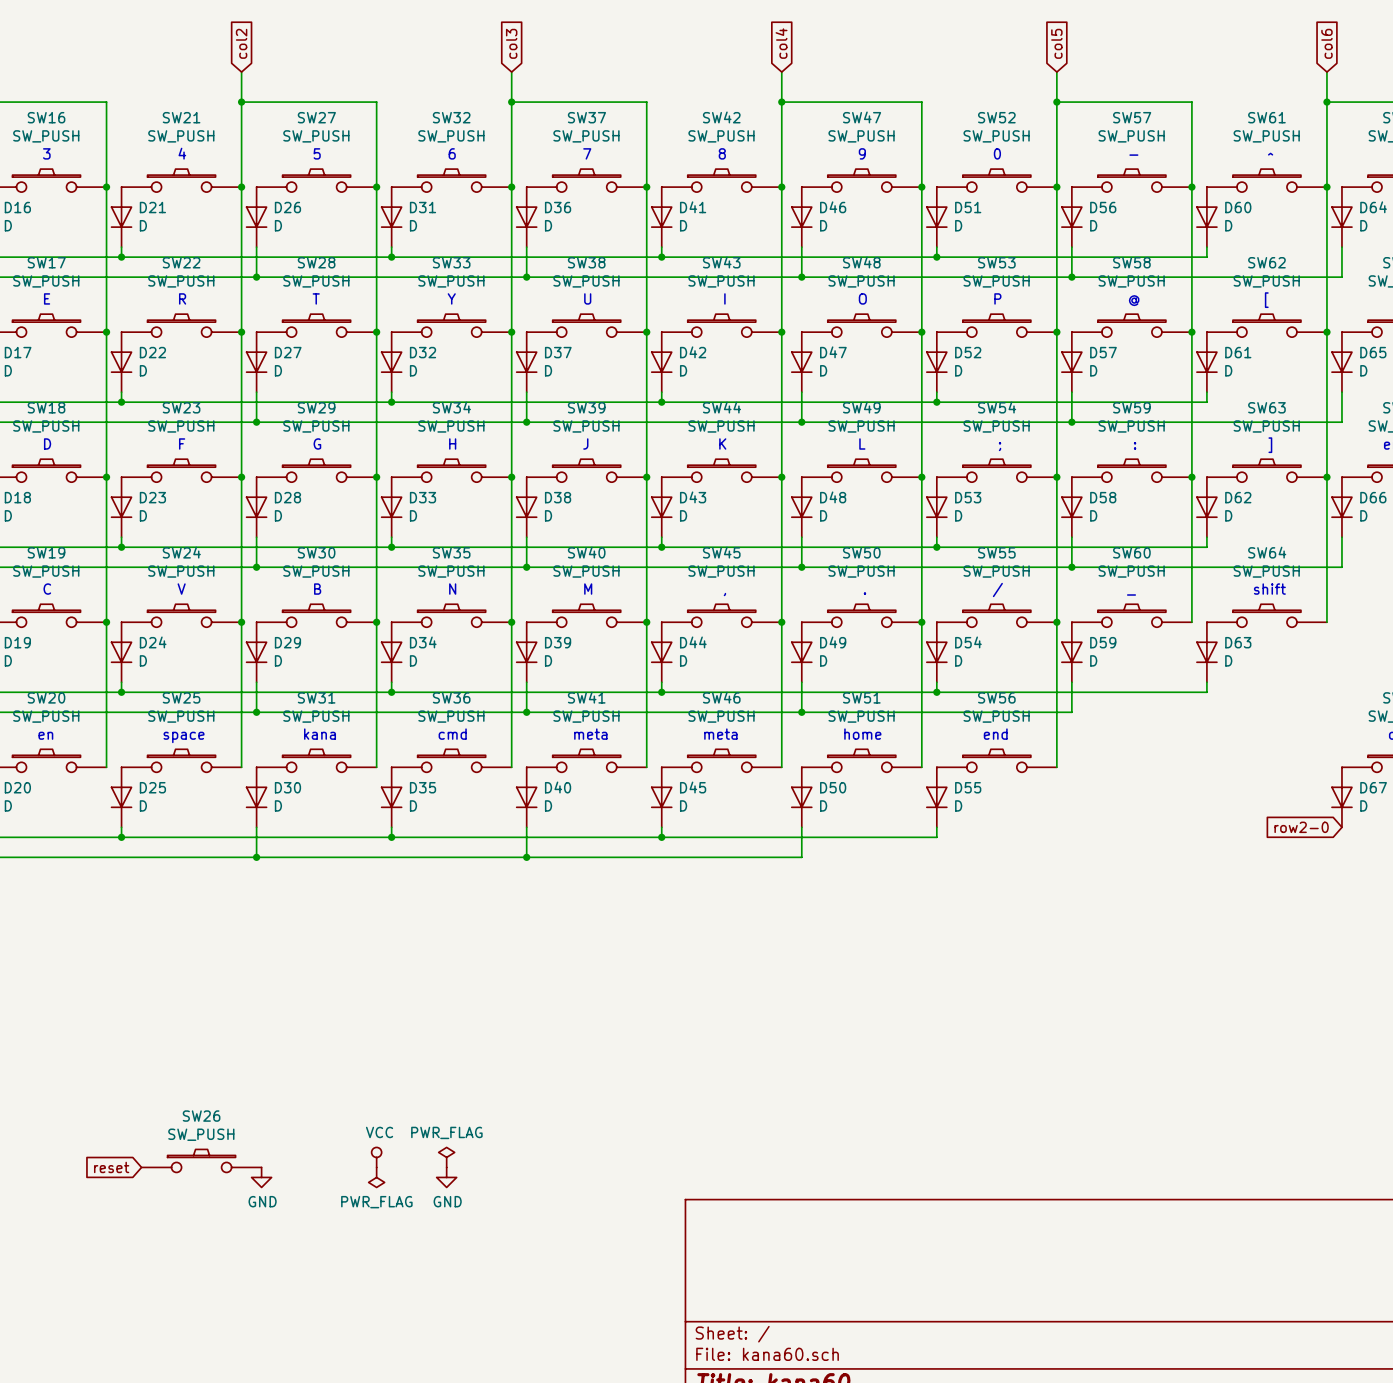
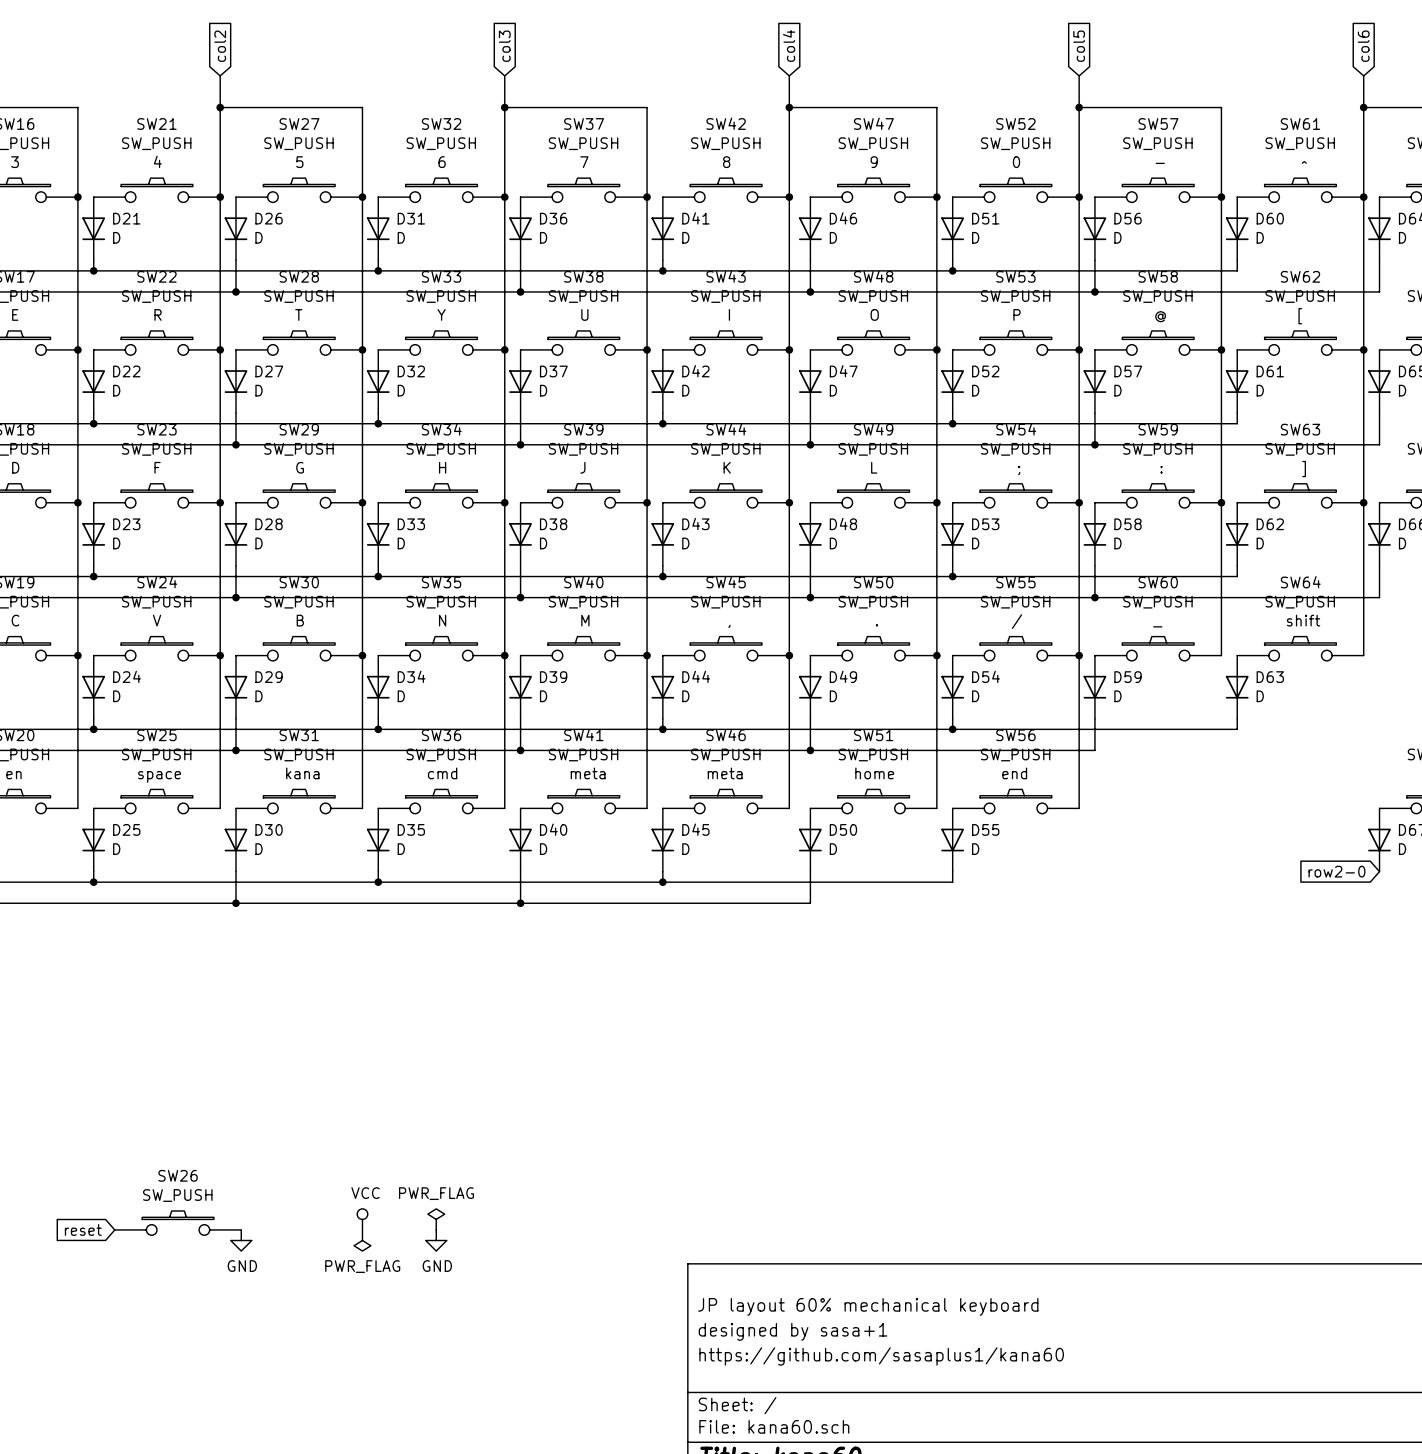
title block: none -> JP layout 60% mechanical keyboard (868, 1306)
title block: none -> designed by sasa+1 (793, 1331)
title block: none -> https://github.com/sasaplus1/kana60 (881, 1356)

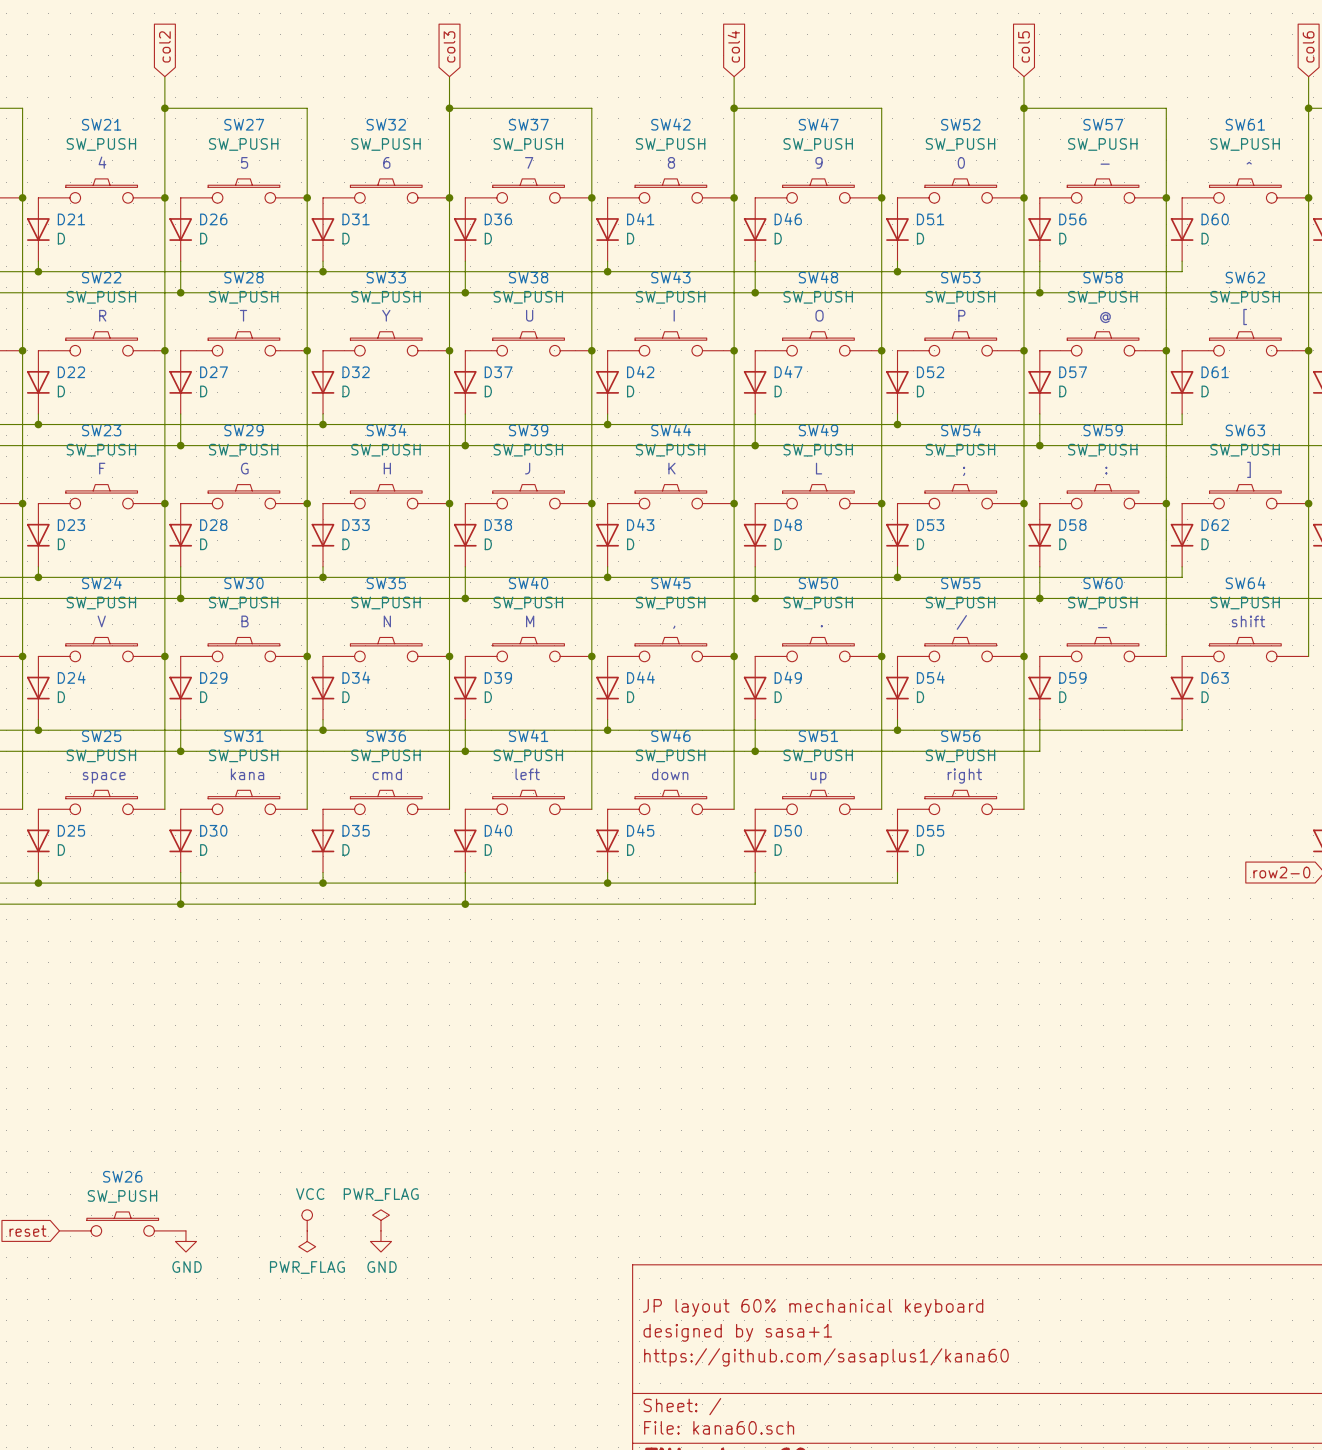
text: meta (588, 773) -> left (527, 774)
text: meta (725, 773) -> down (670, 774)
text: home (874, 773) -> none
text: end (1014, 773) -> right (964, 776)
text: none -> up (818, 777)

